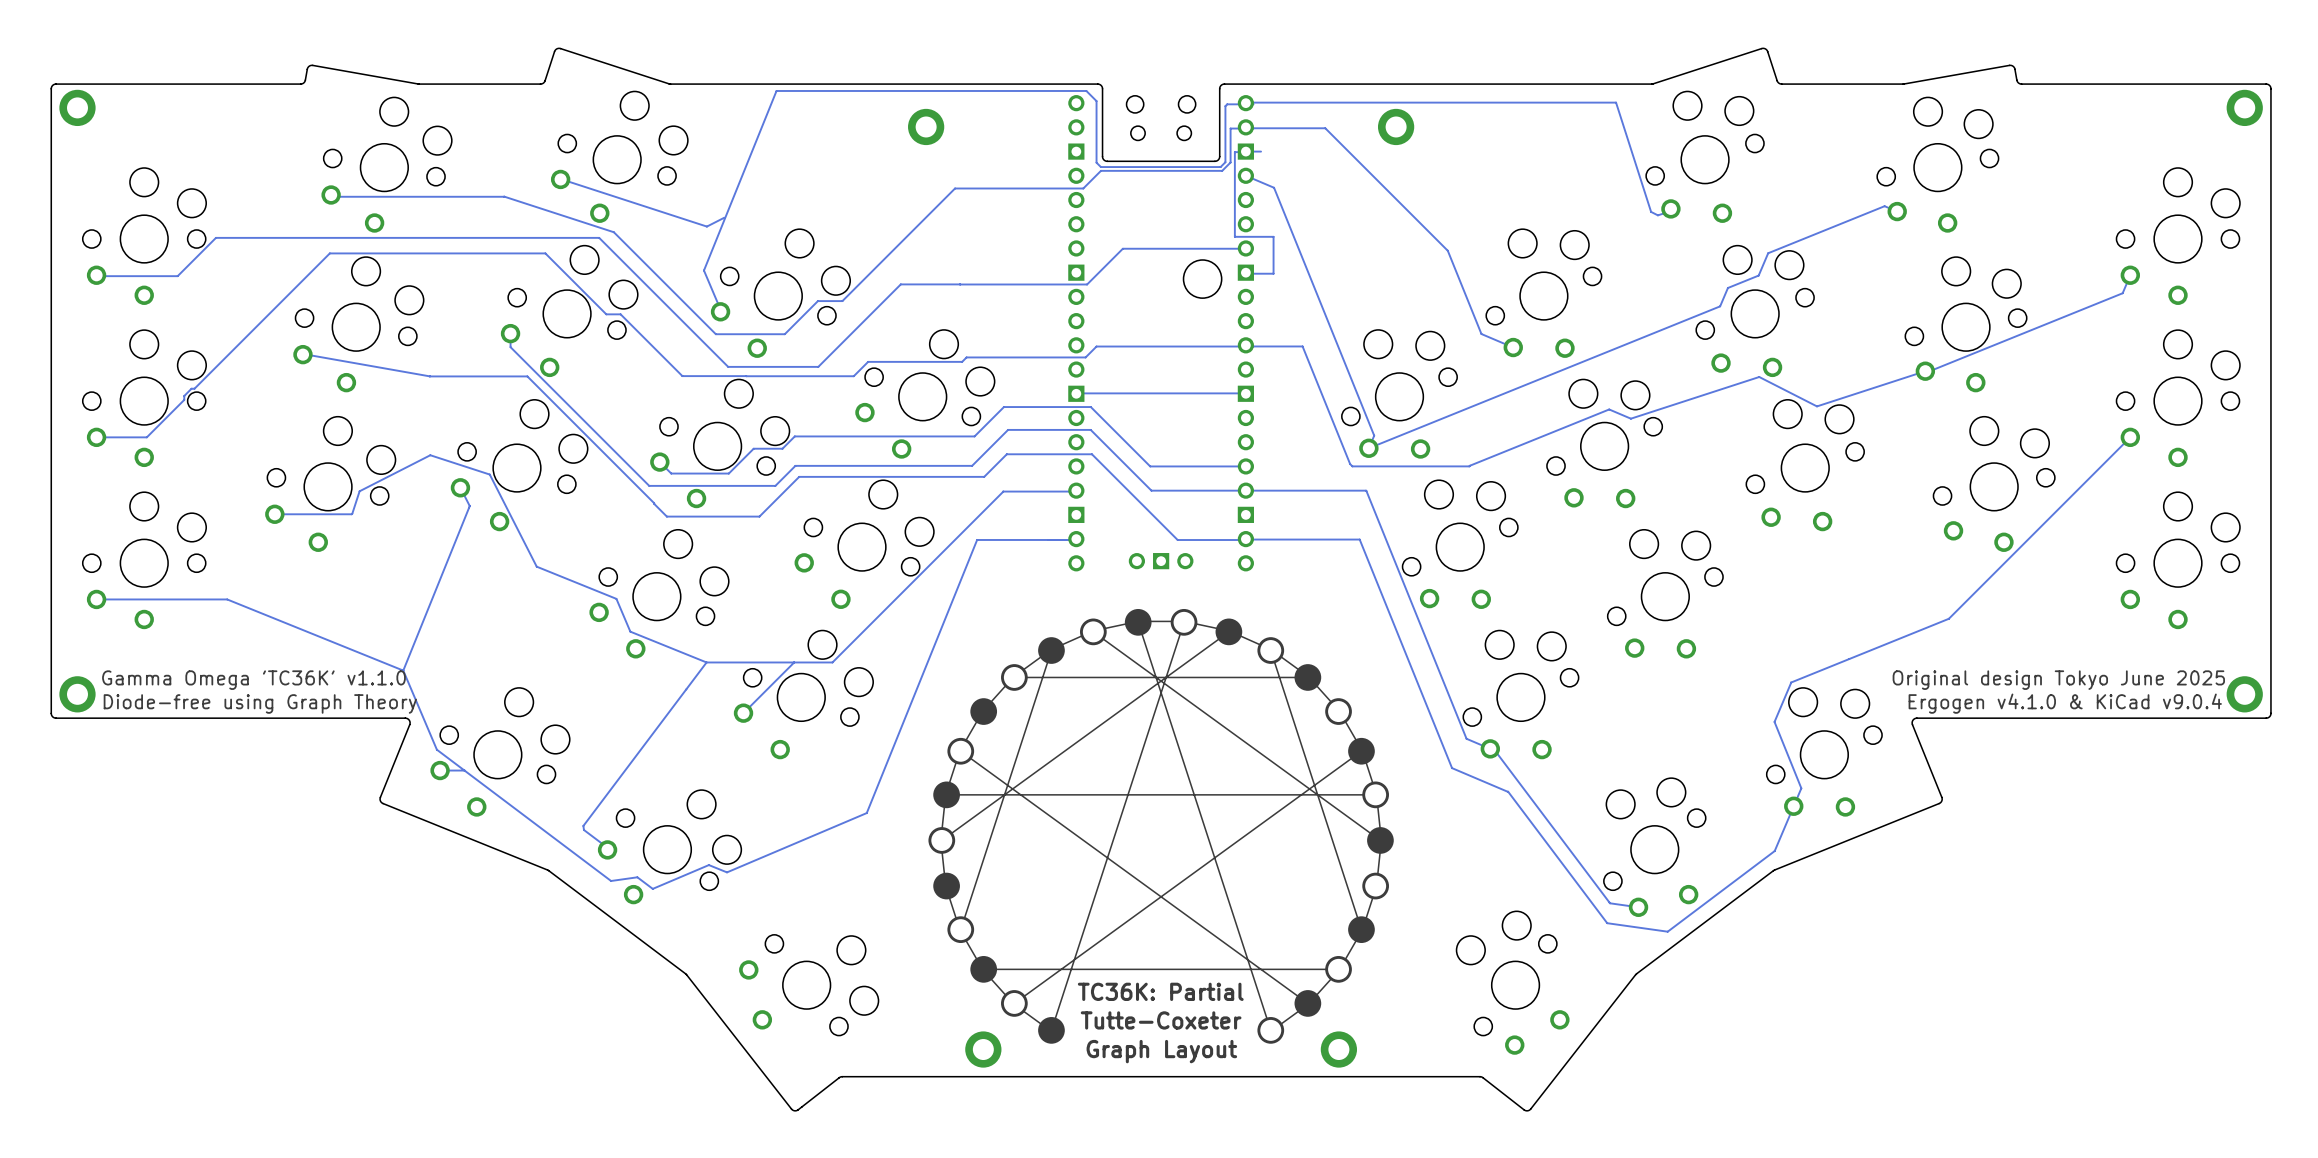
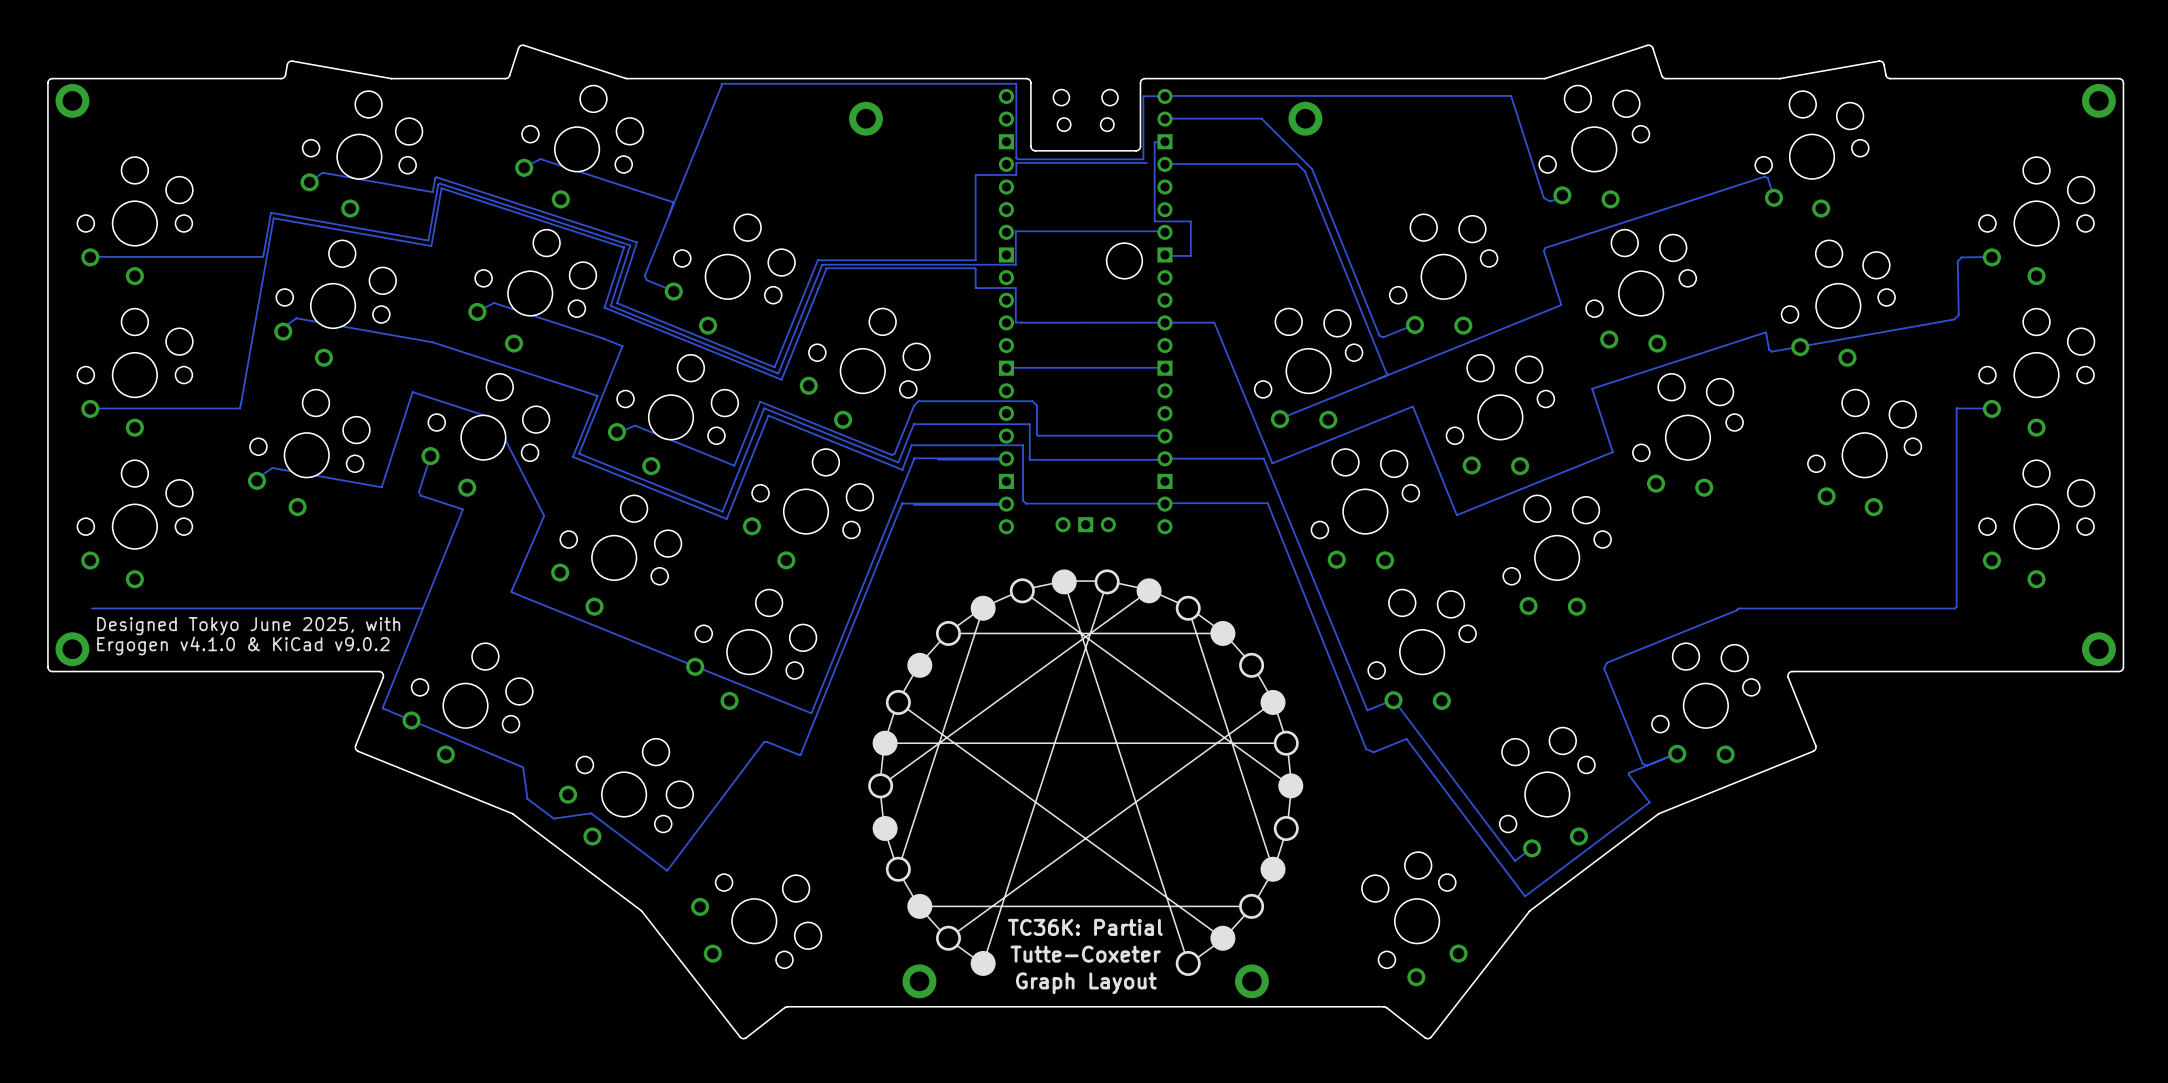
track: none -> (1168, 96) (1143, 96) (1143, 159) (1017, 159) (1016, 83) (721, 83) (644, 275) (646, 280) (673, 291)
track: (1253, 104) (1227, 104) (1225, 106) (1225, 162) (1220, 167) (1100, 167) (1096, 162) (1096, 101) (1086, 90) (776, 90) (703, 270) (721, 311) -> none
track: none -> (1165, 118) (1261, 118) (1312, 169)
track: (1249, 128) (1325, 128) (1447, 250) (1481, 334) (1513, 347) -> none
track: (1253, 128) (1230, 128) (1230, 162) (1222, 170) (1100, 170) (1083, 188) (955, 188) (842, 301) (817, 301) (784, 334) (715, 334) (613, 232) (504, 196) (332, 196) -> none
track: (1261, 151) (1245, 151) -> none
track: none -> (1146, 162) (1016, 162) (1016, 174) (975, 174) (975, 260) (817, 260) (774, 367) (617, 303) (636, 242) (436, 177) (432, 192) (322, 172) (309, 181)
track: (1245, 175) (1274, 187) (1374, 435) (1368, 448) (1720, 306) (1727, 287) (1758, 275) (1768, 253) (1884, 206) (1897, 211) -> none
track: none -> (1165, 163) (1297, 163) (1304, 171) (1387, 375)
track: none -> (524, 167) (540, 159) (673, 202) (668, 216)
track: (564, 180) (706, 226) (724, 217) -> none
track: none -> (1312, 169) (1379, 335) (1383, 337) (1415, 324)
track: none -> (441, 188) (624, 247) (604, 307) (781, 379) (826, 268) (974, 268) (975, 288) (1015, 287) (1015, 322) (1214, 322) (1272, 463) (1412, 406) (1457, 514) (1612, 452) (1592, 388) (1766, 332) (1769, 349) (1771, 351) (1954, 319) (1958, 314) (1957, 261) (1961, 257) (1992, 256)
track: none -> (441, 188) (430, 246) (273, 218) (241, 403)
track: none -> (1774, 197) (1767, 177) (1765, 176) (1545, 247) (1543, 250) (1561, 305) (1280, 418)
track: none -> (1167, 231) (1015, 231) (1015, 264) (823, 264) (778, 373) (610, 305) (630, 245) (439, 183) (428, 240) (271, 212) (262, 256) (90, 256)
track: (1252, 248) (1122, 248) (1087, 284) (960, 284) -> none
track: (2130, 275) (2122, 293) (1927, 372) -> none
track: (100, 276) (177, 276) (215, 237) (599, 237) (728, 366) (818, 366) (900, 284) (960, 284) -> none
track: none -> (477, 311) (494, 303) (603, 338)
track: (510, 334) (510, 347) (649, 485) (775, 485) (795, 465) (972, 465) (1008, 429) (1090, 429) (1151, 490) (1366, 490) (1466, 738) (1490, 748) -> none
track: (1250, 346) (1302, 346) (1352, 466) (1469, 466) (1609, 409) (1630, 418) (1759, 376) (1816, 406) (1925, 371) -> none
track: (1253, 346) (1096, 346) (1085, 357) (966, 357) (962, 361) (868, 361) (853, 376) (746, 376) -> none
track: none -> (280, 329) (296, 318) (432, 342) (597, 395) (572, 456) (726, 519) (768, 415) (902, 469) (911, 445) (1023, 445) (1023, 500) (1025, 503) (1267, 503) (1366, 749) (1373, 752) (1406, 739) (1525, 896) (1649, 802) (1629, 775) (1629, 772) (1677, 753)
track: (304, 354) (429, 376) -> none
track: none -> (603, 338) (622, 346) (579, 453) (722, 511) (764, 408) (898, 462) (913, 424) (1029, 424) (1029, 459) (1263, 458) (1367, 710) (1393, 699) (1514, 860) (1532, 847)
track: (429, 376) (527, 376) (666, 516) (759, 516) (799, 476) (984, 476) (1006, 454) (1091, 454) (1177, 540) (1249, 540) -> none
track: (746, 376) (682, 376) (620, 314) (606, 314) (545, 253) (329, 253) (194, 388) (191, 388) (184, 395) (184, 399) (146, 437) (96, 437) -> none
track: none -> (240, 403) (240, 408) (90, 408)
track: none -> (1992, 408) (1956, 408) (1956, 607) (1738, 608) (1606, 662) (1604, 668) (1642, 763) (1647, 765)
track: (2130, 437) (1948, 618) (1790, 682) (1774, 721) (1801, 788) (1774, 850) -> none
track: none -> (620, 431) (635, 425) (734, 465) (760, 401) (892, 455) (894, 453) (914, 405) (918, 401) (1032, 401) (1036, 405) (1037, 435) (1165, 435)
track: (659, 462) (671, 473) (728, 473) (753, 448) (782, 448) (794, 436) (974, 436) (1003, 407) (1090, 407) (1150, 466) (1245, 466) -> none
track: (460, 487) (469, 506) -> none
track: none -> (430, 455) (418, 491)
track: none -> (1006, 458) (914, 458) (810, 713) (513, 592)
track: (1003, 491) (832, 662) (706, 662) (630, 631) (616, 598) (536, 566) (489, 474) (430, 455) (359, 491) (351, 514) (274, 514) -> none
track: (469, 506) (403, 670) -> none
track: none -> (254, 479) (272, 467) (381, 487) (412, 392) (494, 418) (544, 515) (511, 591) (513, 592)
track: none -> (418, 491) (420, 495)
track: none -> (420, 495) (462, 509) (383, 708) (523, 767) (527, 798) (553, 818) (591, 813) (667, 870) (764, 742) (800, 754) (902, 503) (1006, 503)
track: (1250, 539) (1359, 539) (1452, 768) (1508, 791) (1607, 923) (1667, 931) (1774, 851) -> none
track: (977, 540) (866, 813) (727, 872) (708, 865) (652, 888) (637, 877) (611, 880) (436, 749) (403, 670) -> none
track: (96, 599) (227, 599) (403, 670) -> none
track: none -> (422, 608) (91, 608)
track: (706, 662) (583, 825) (583, 830) (611, 850) -> none
track: (794, 662) (743, 713) -> none
text: none -> Designed Tokyo June 2025, with (248, 626)
text: Gamma Omega 'TC36K' v1.1.0 (253, 680) -> none
text: Original design Tokyo June 2025 (2058, 680) -> none
text: none -> Ergogen v4.1.0 & KiCad v9.0.2 (243, 645)
text: Diode-free using Graph Theory (260, 703) -> none
text: Ergogen v4.1.0 & KiCad v9.0.4 (2065, 703) -> none
track: (1494, 749) (1610, 903) (1638, 907) -> none
track: (464, 770) (440, 770) -> none

